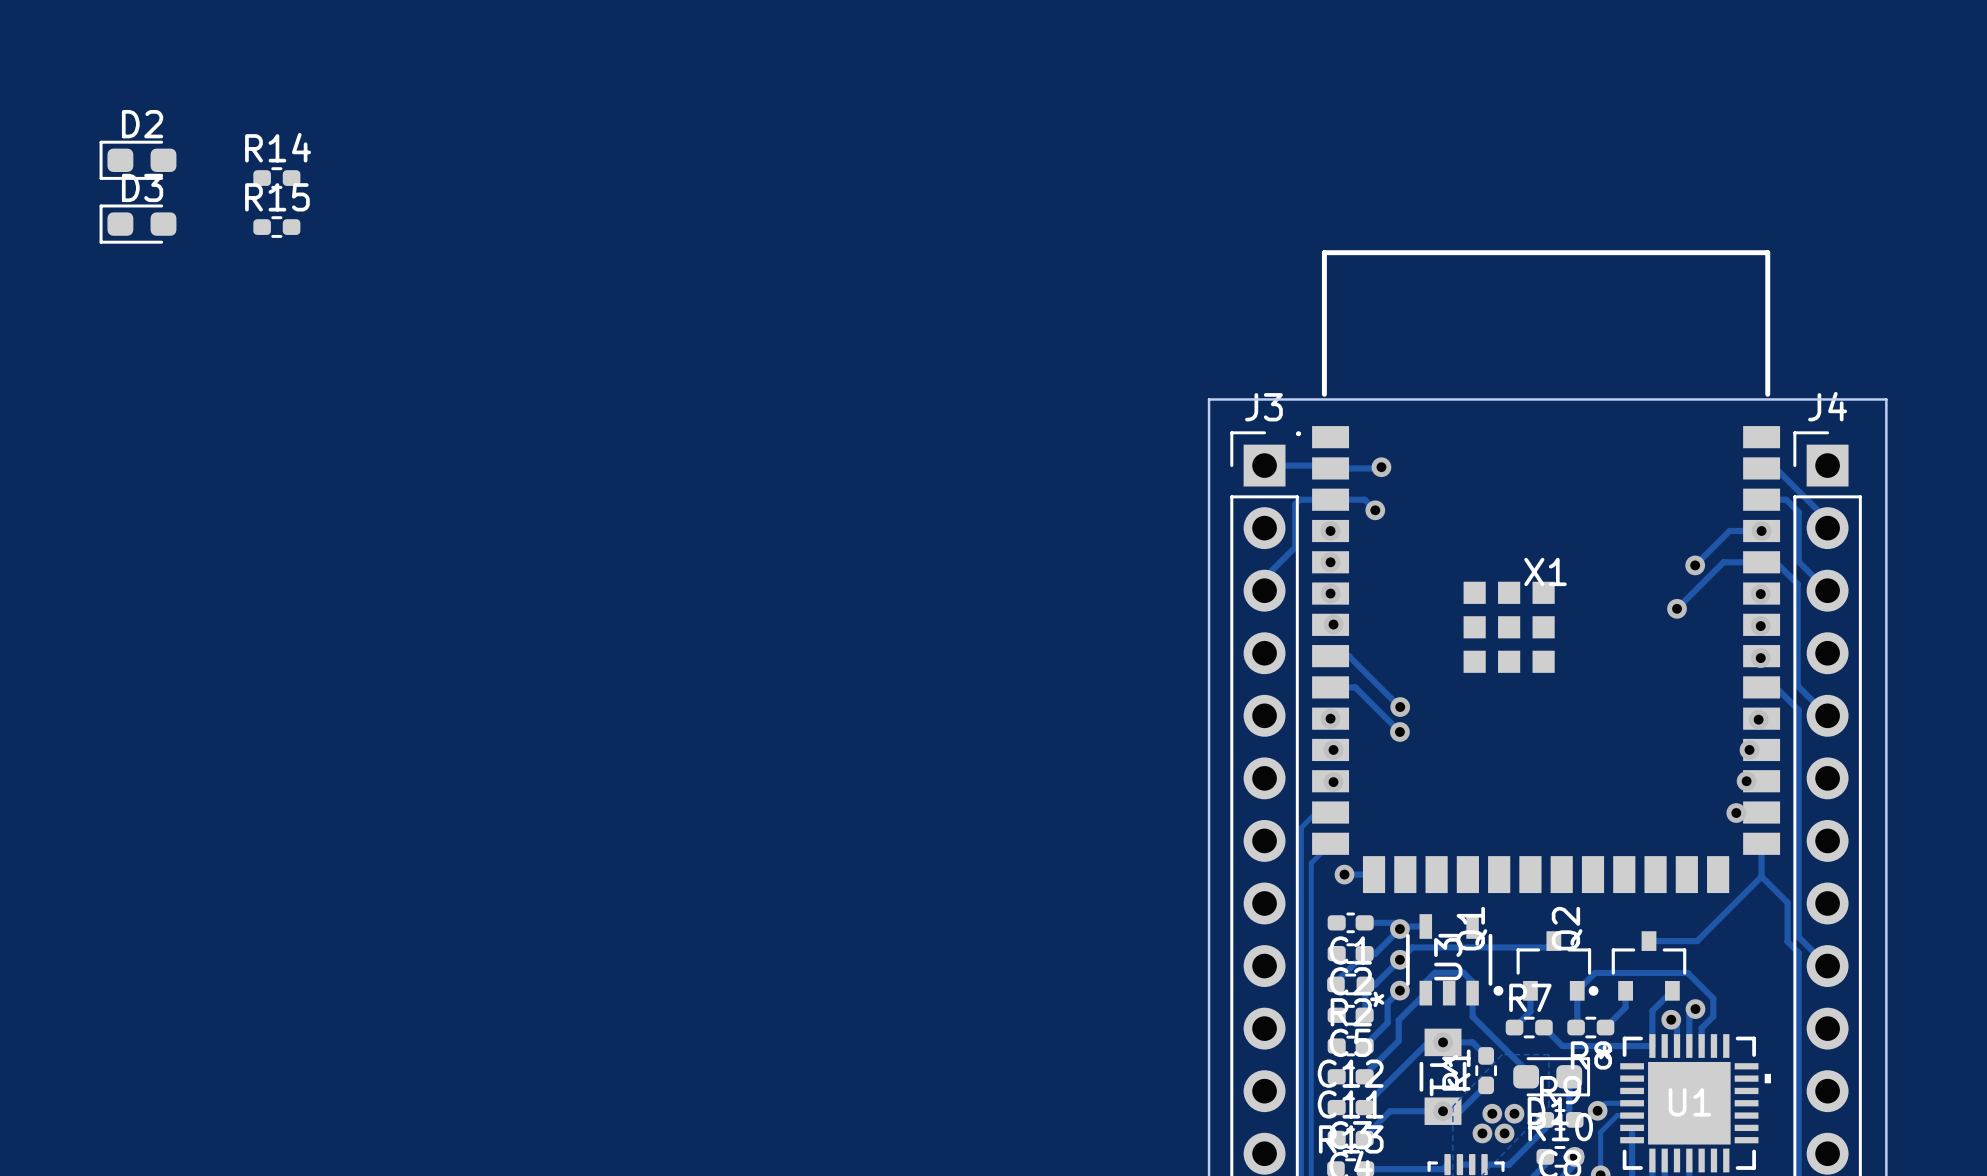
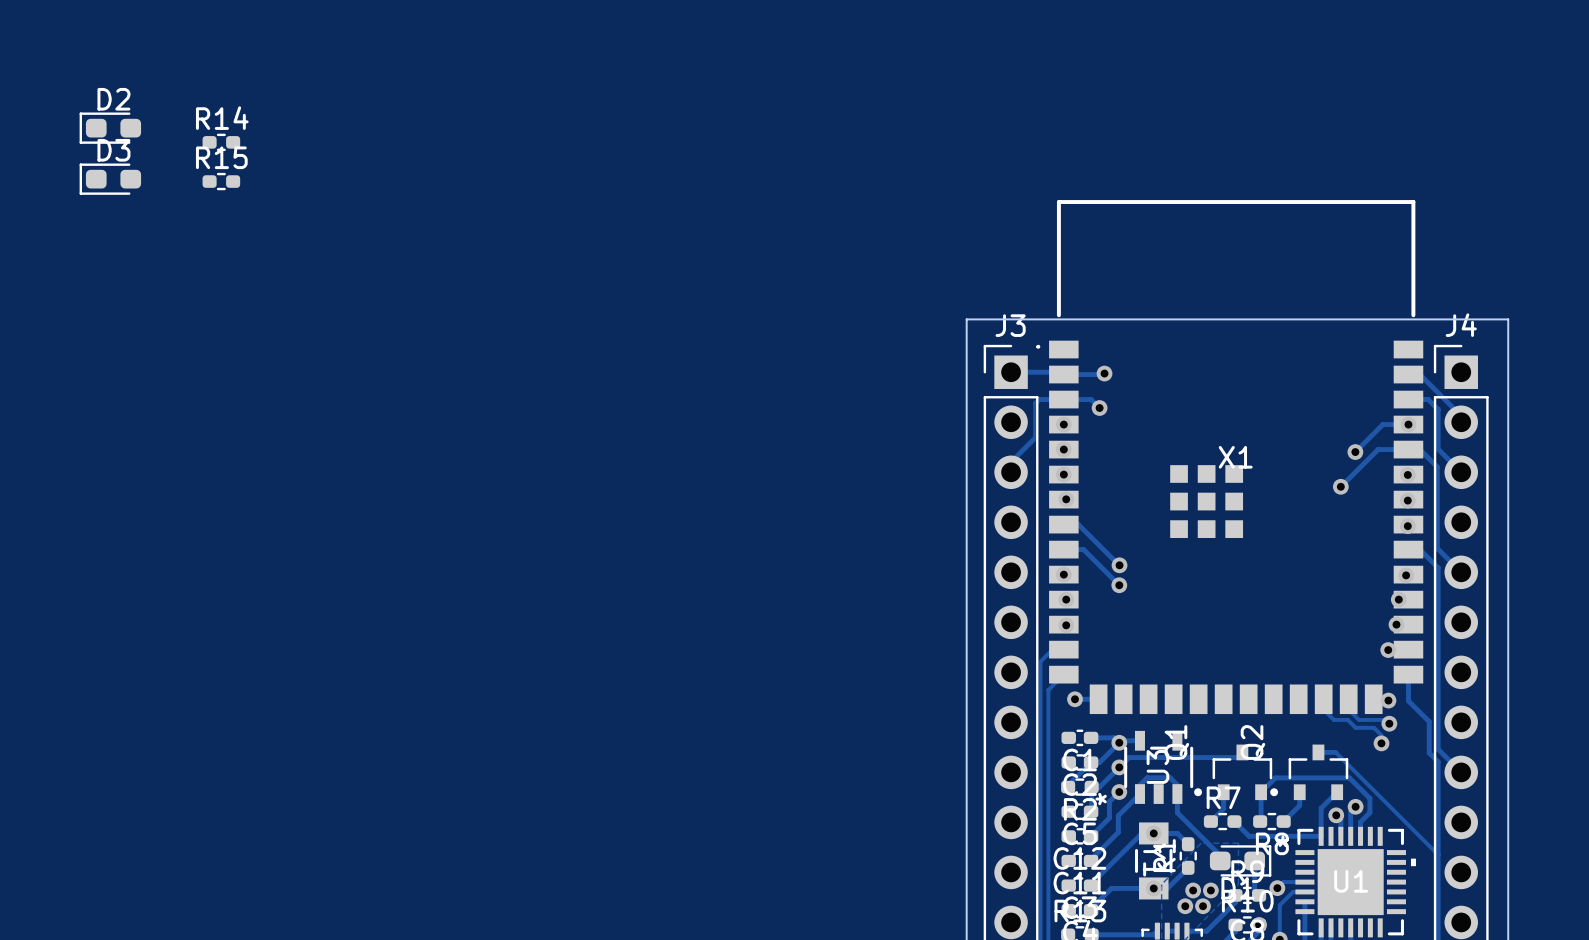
track: none -> (1323, 699) (1323, 709) (1333, 719) (1347, 719) (1355, 727) (1373, 727) (1381, 735) (1381, 743)
track: none -> (1348, 699) (1348, 709) (1358, 719) (1385, 719) (1389, 723)
via: none -> (1388, 700)
track: (1761, 876) (1697, 941) (1670, 941) -> (1437, 854) (1335, 752)
via: none -> (1389, 723)
via: none -> (1381, 743)

